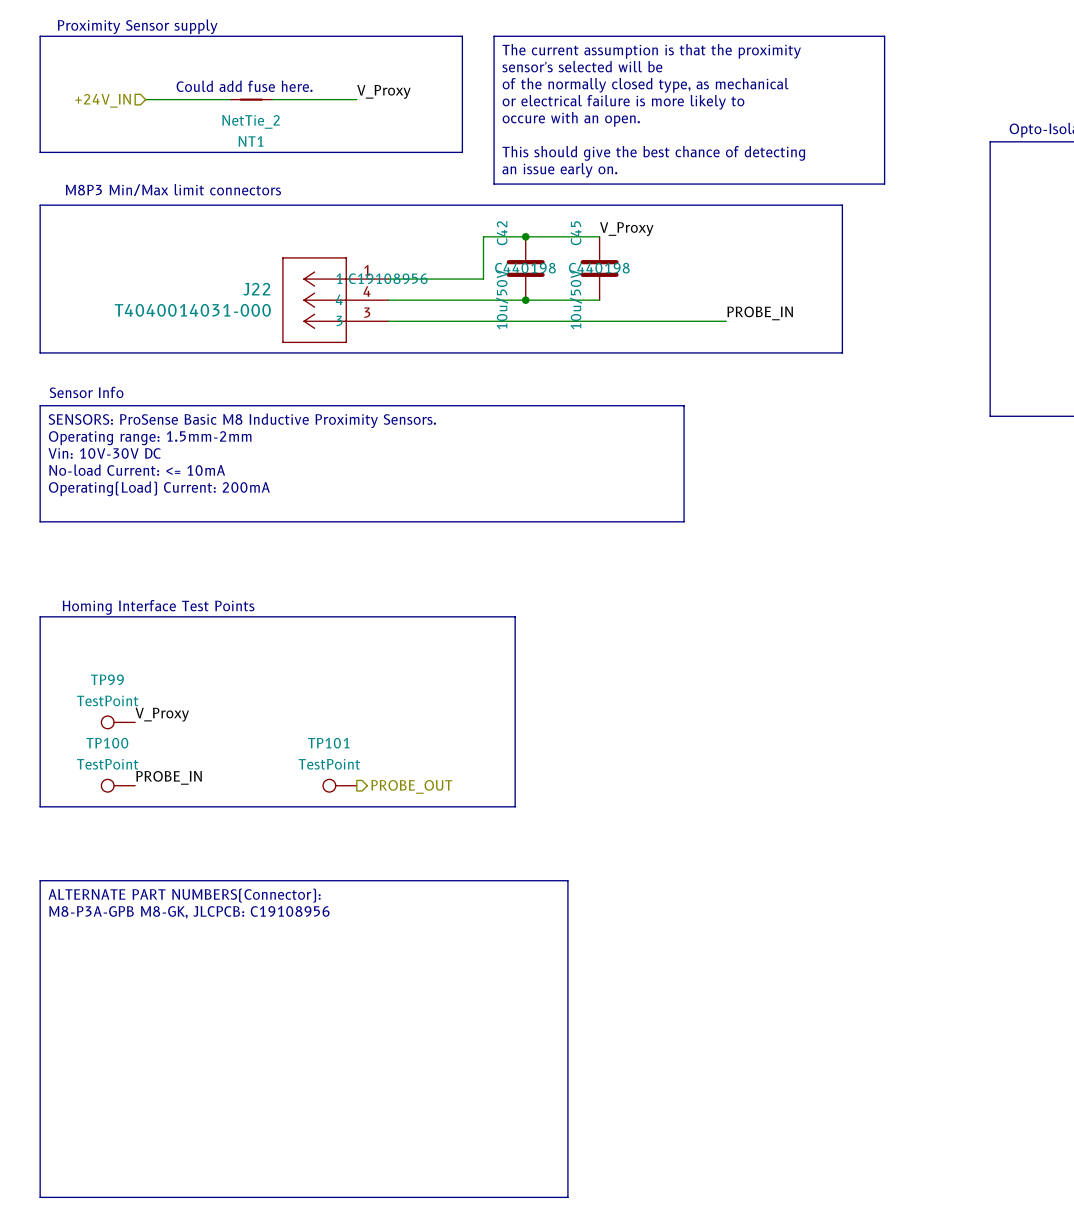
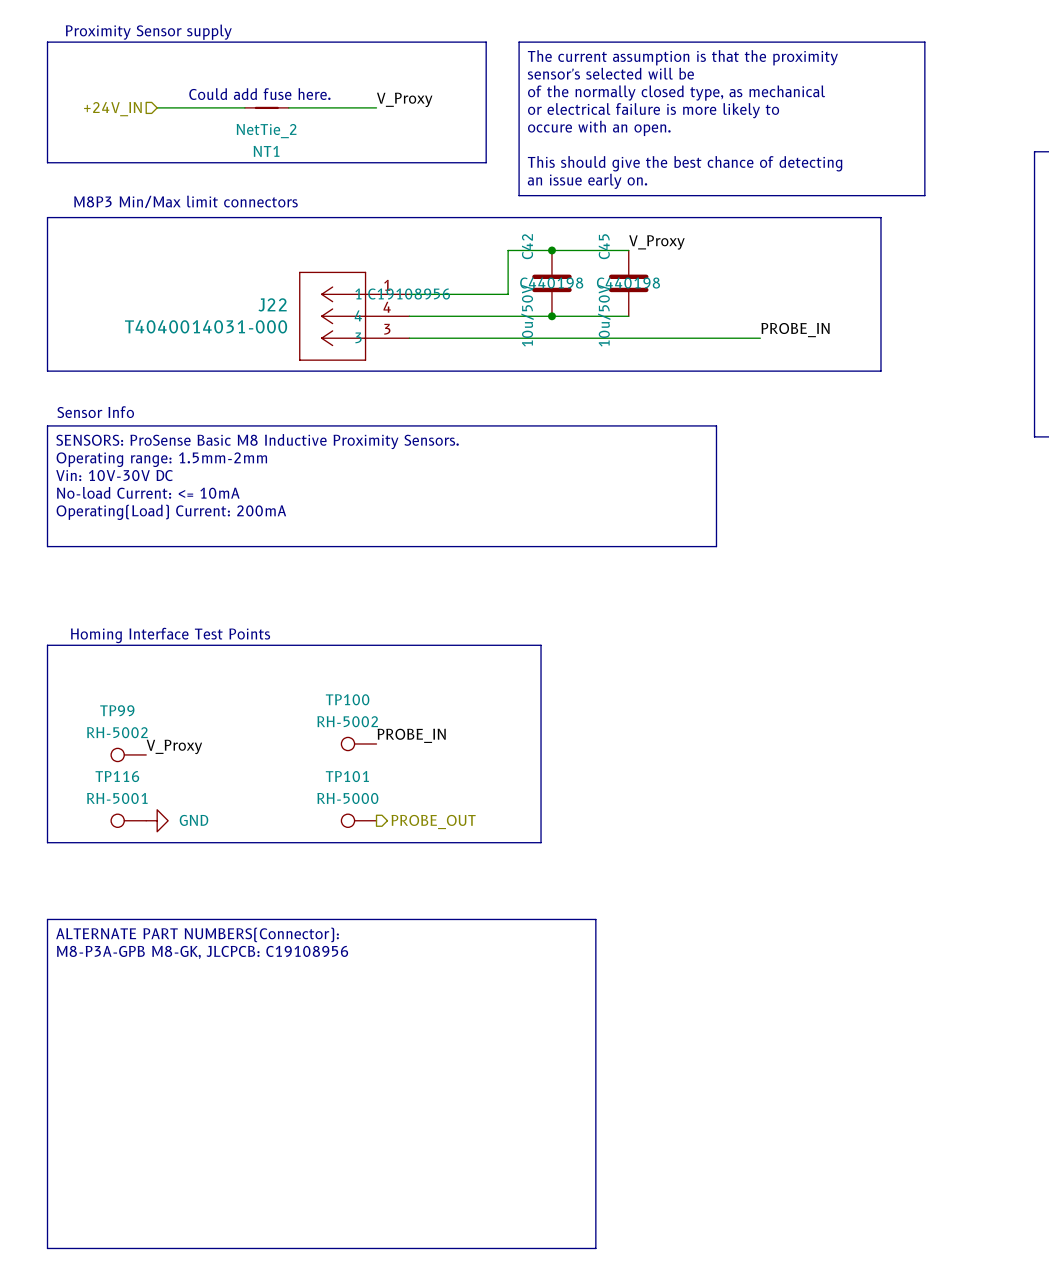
TP99 value: TestPoint (107, 700) -> RH-5002 (117, 732)
label: none -> PROBE_IN (411, 735)
TP100: none -> RH-5002 (358, 743)
TP100 name: TP100 (107, 743) -> TP116 (117, 776)
TP100 value: TestPoint (107, 764) -> RH-5001 (117, 798)
TP101 value: TestPoint (329, 764) -> RH-5000 (347, 798)
label: PROBE_IN (169, 777) -> none
power symbol: none -> GND (157, 820)

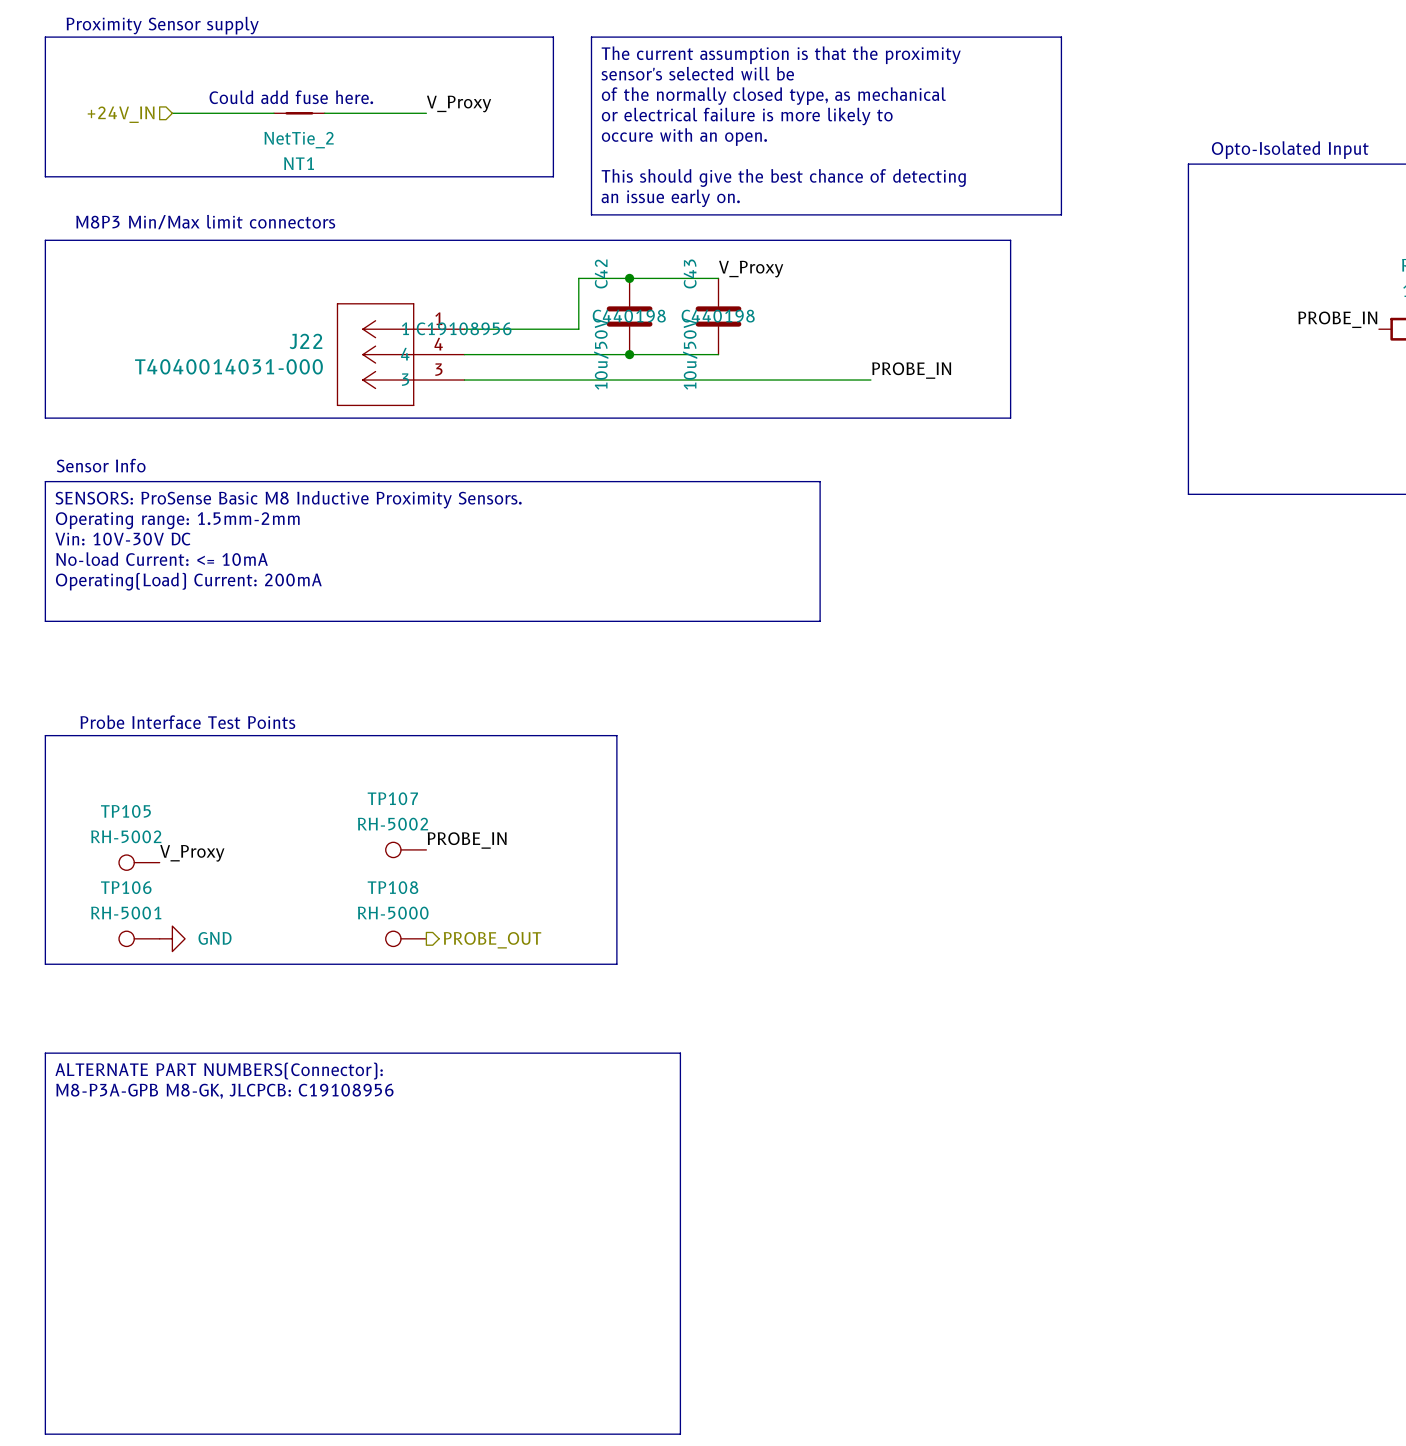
C45 name: C45 (604, 246) -> C43 (690, 273)
text: Homing Interface Test Points (170, 635) -> Probe Interface Test Points (187, 722)
TP100 name: TP100 (347, 699) -> TP107 (392, 798)
TP99 name: TP99 (117, 710) -> TP105 (125, 811)
TP116 name: TP116 (117, 776) -> TP106 (126, 887)
TP101 name: TP101 (347, 776) -> TP108 (392, 887)

